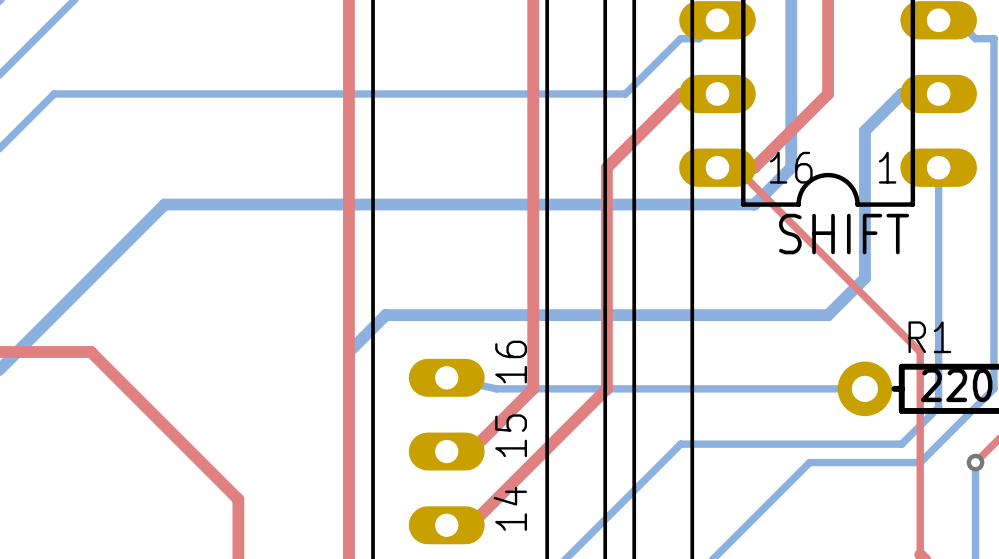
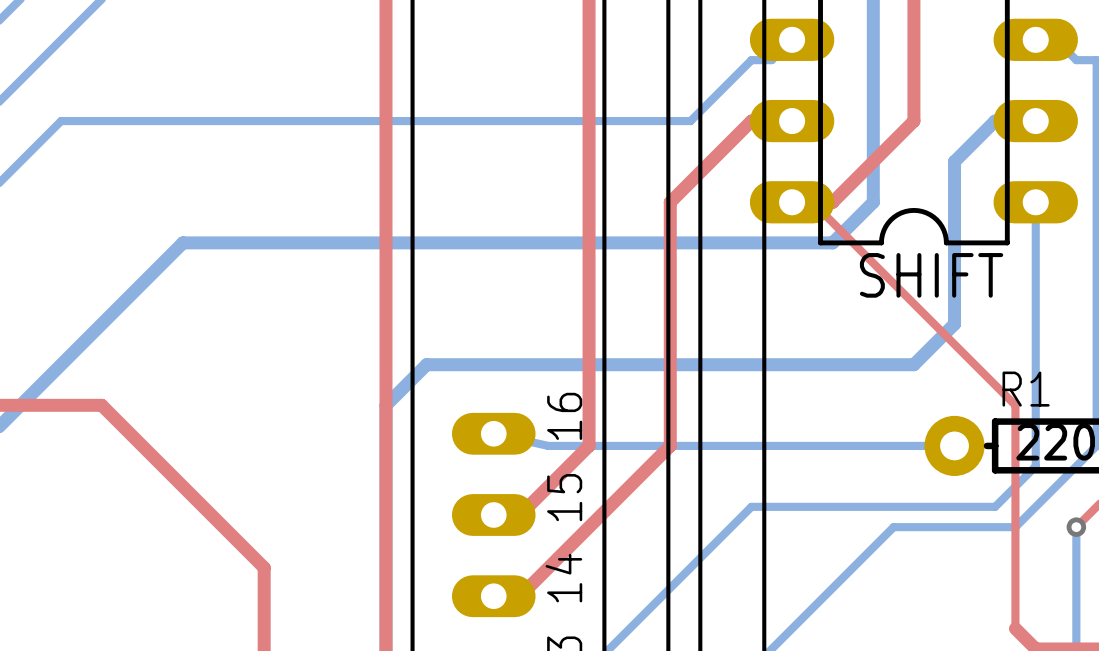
text: 16 (791, 167) -> none
text: 1 (887, 167) -> none

